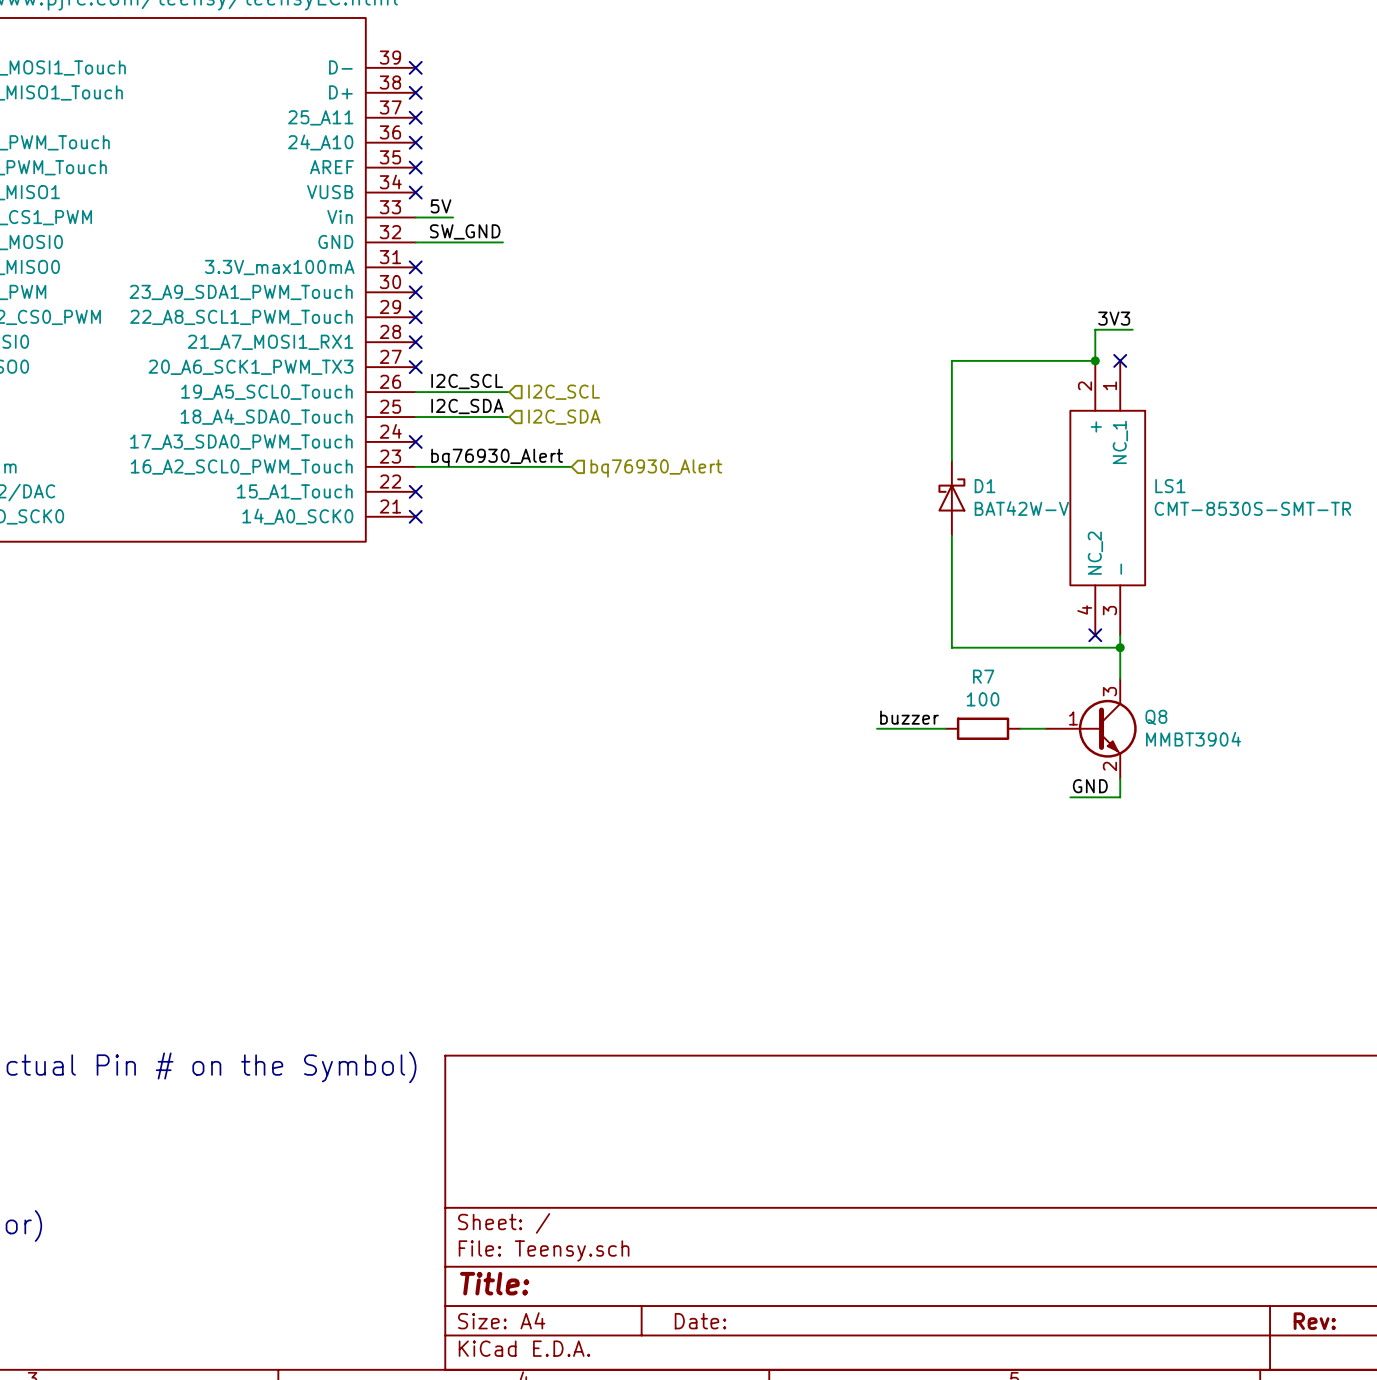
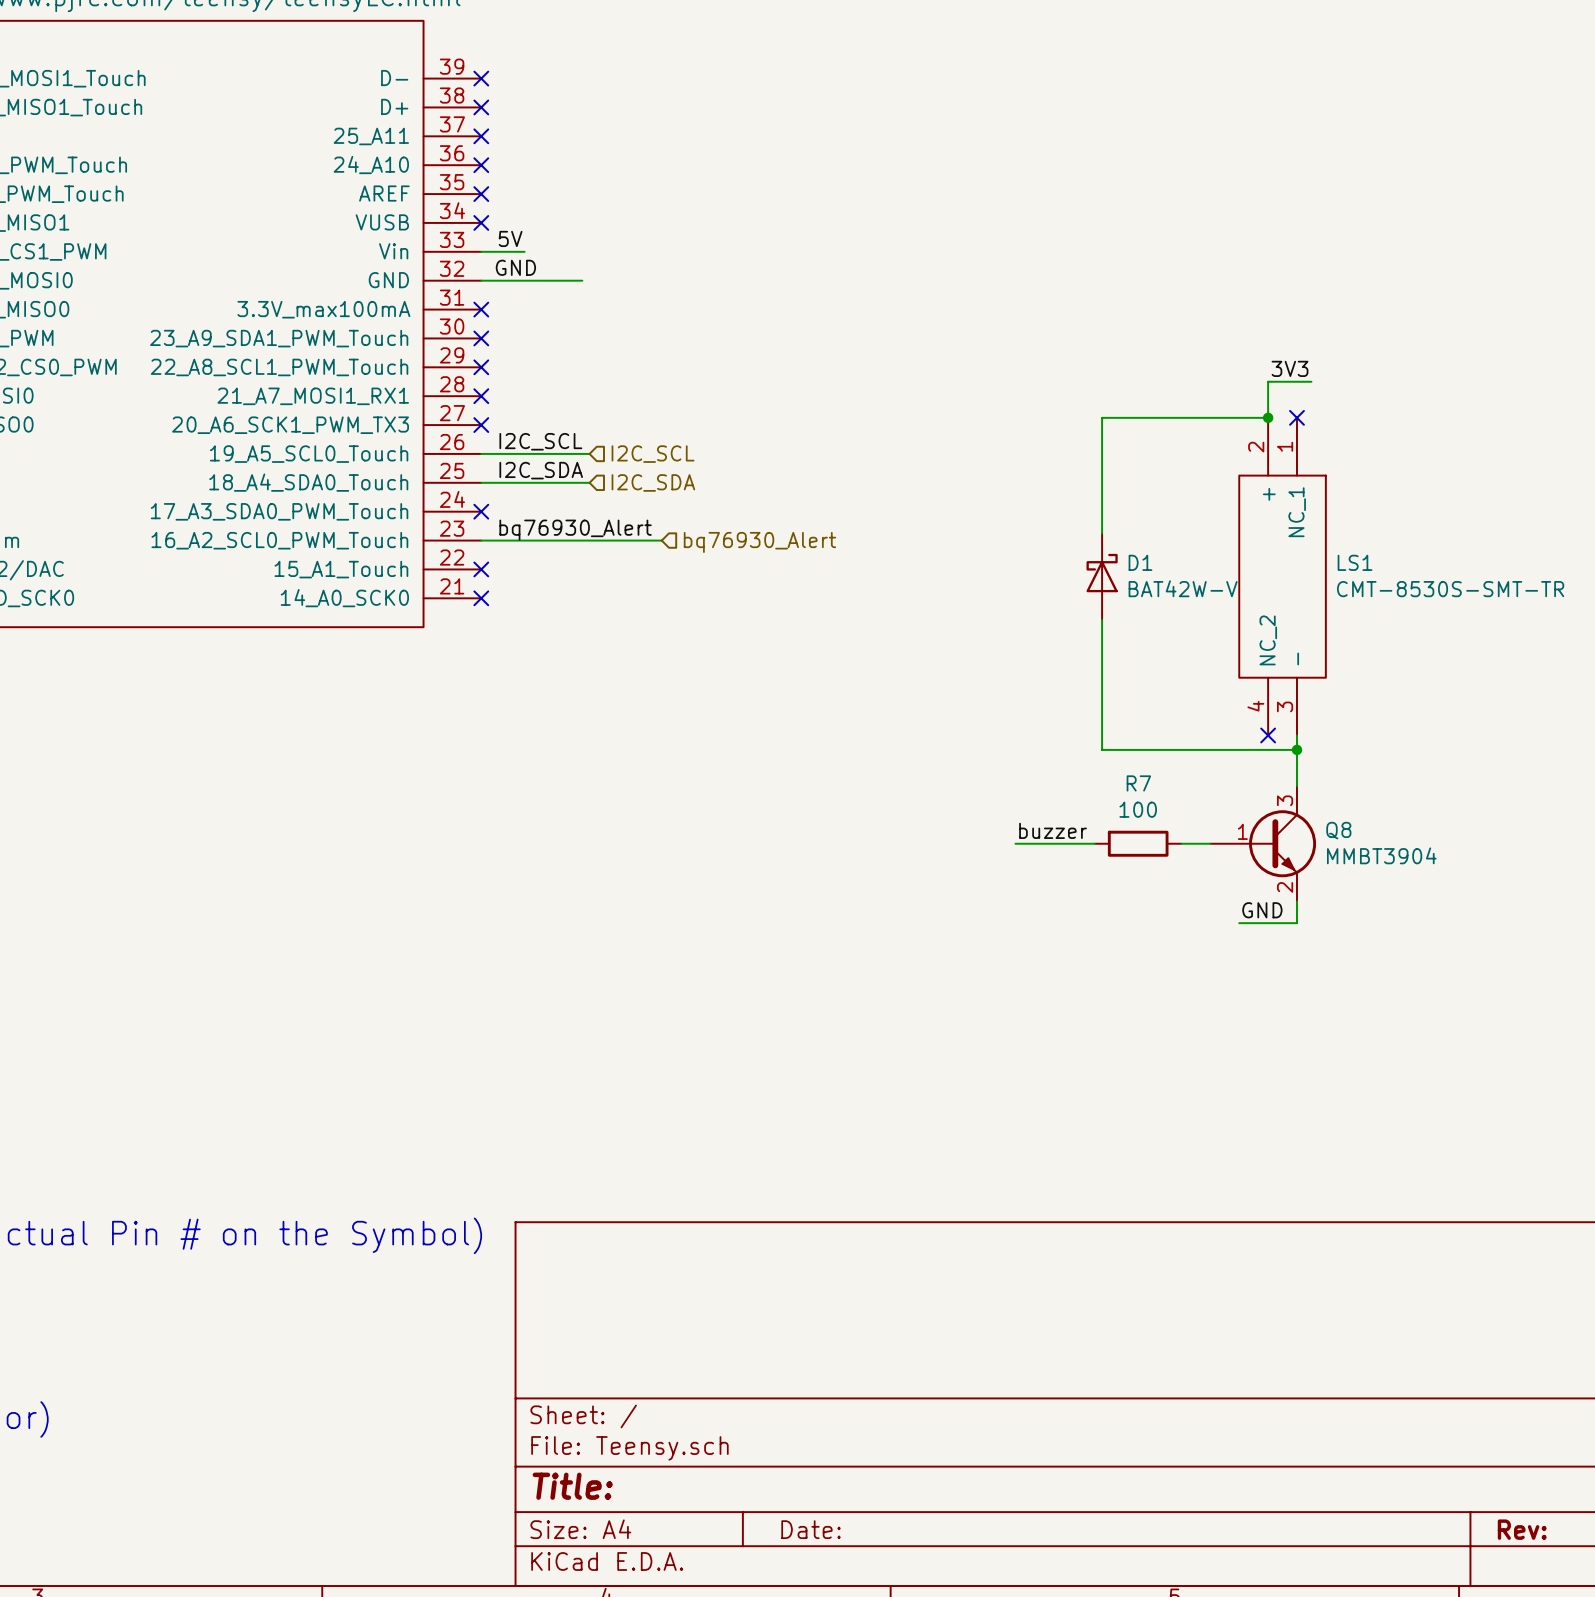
label: SW_GND (465, 231) -> GND (515, 267)

